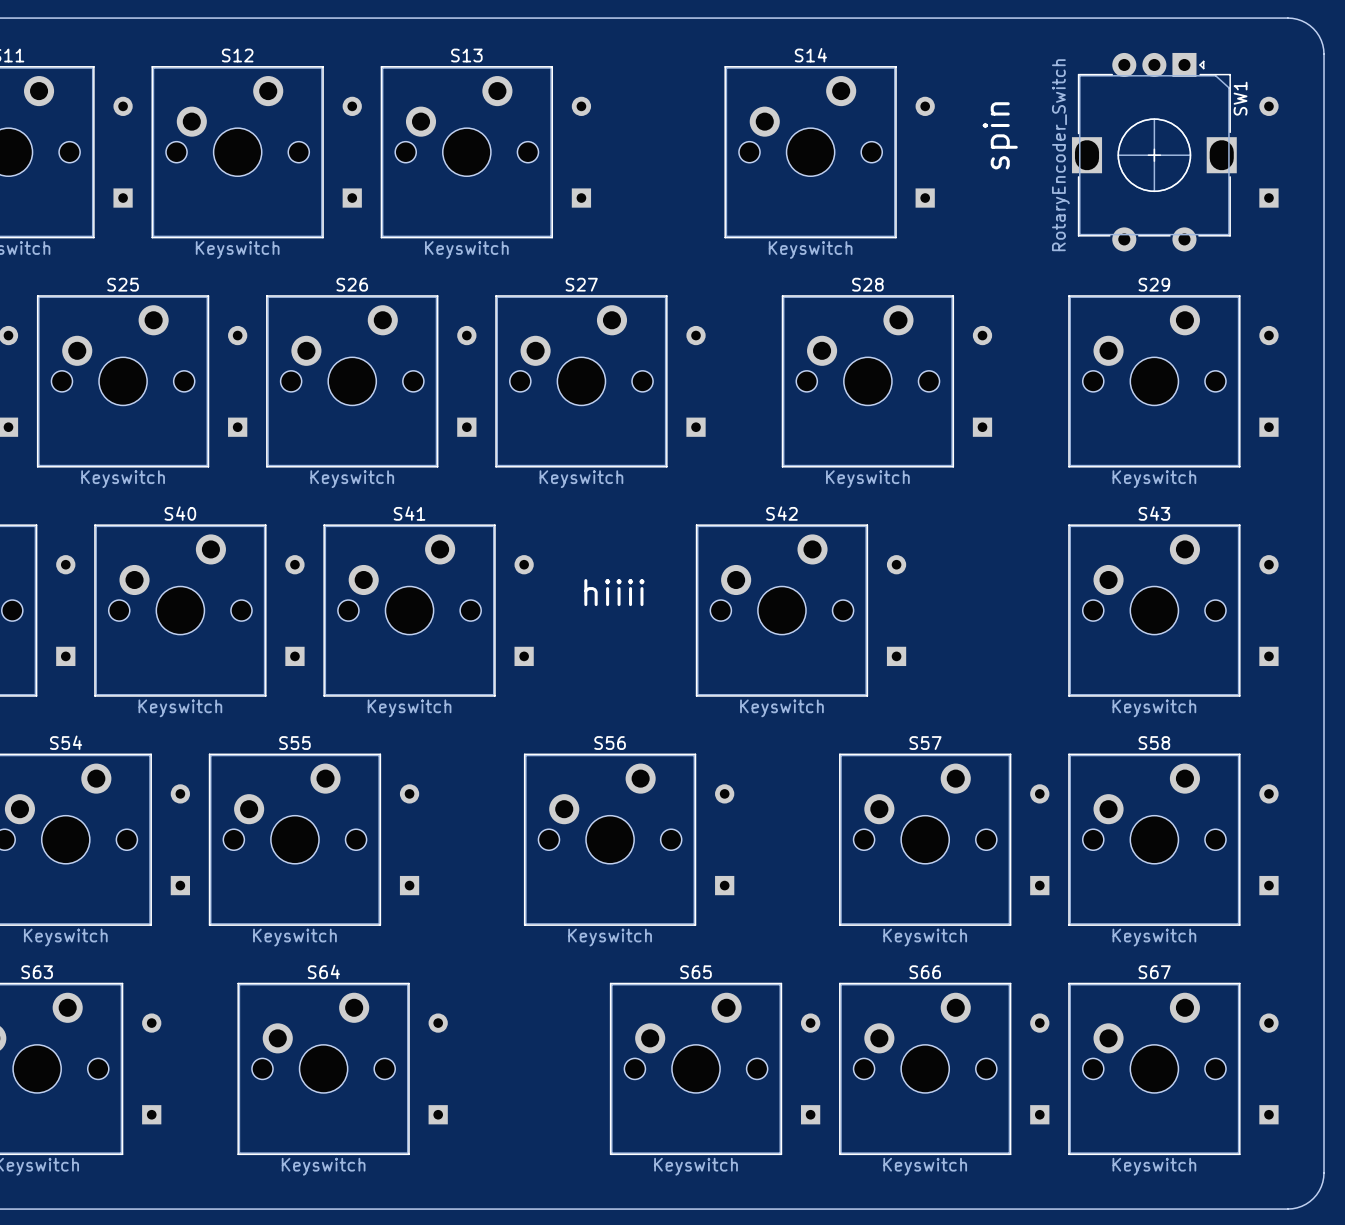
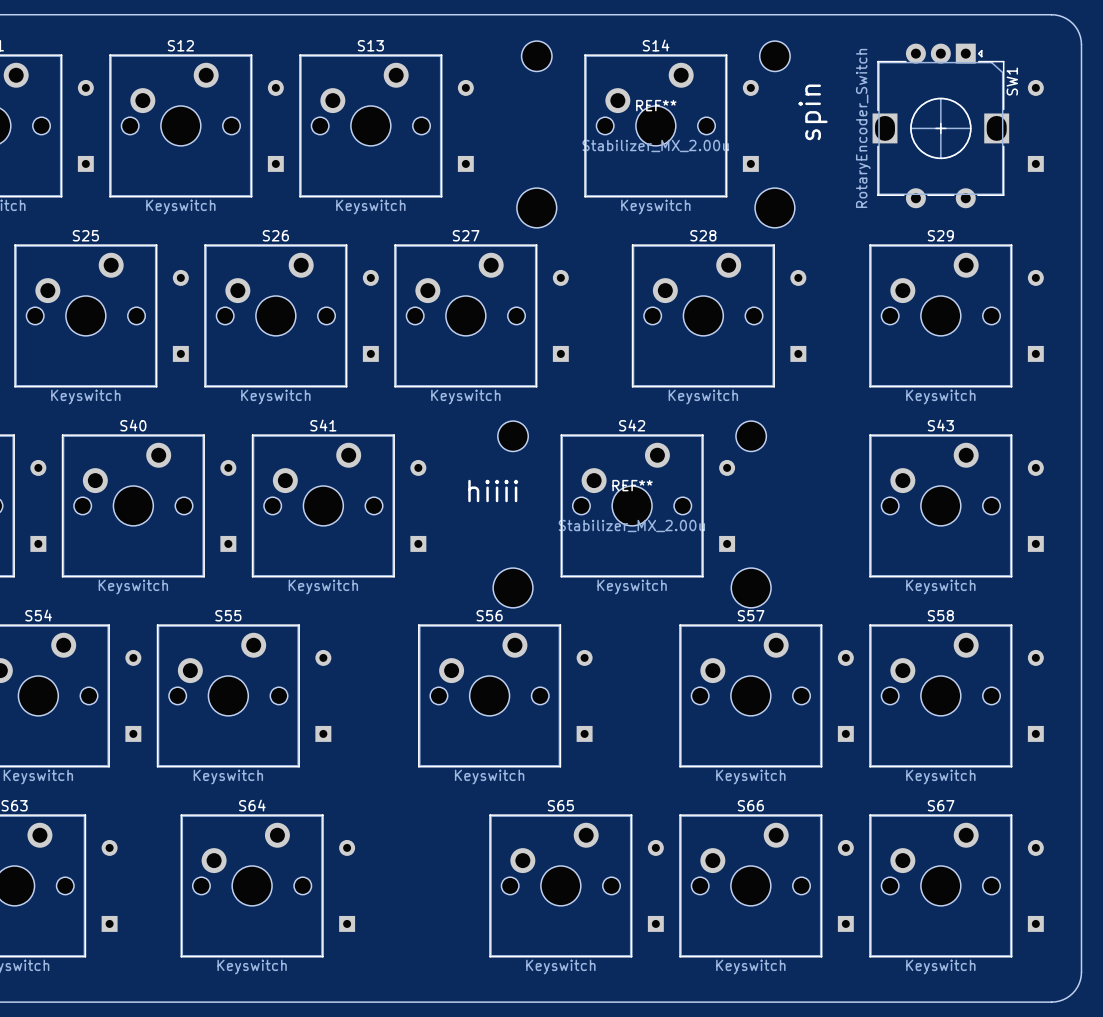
REF**: none -> Stabilizer_MX_2.00u (655, 134)
REF**: none -> Stabilizer_MX_2.00u (632, 514)

